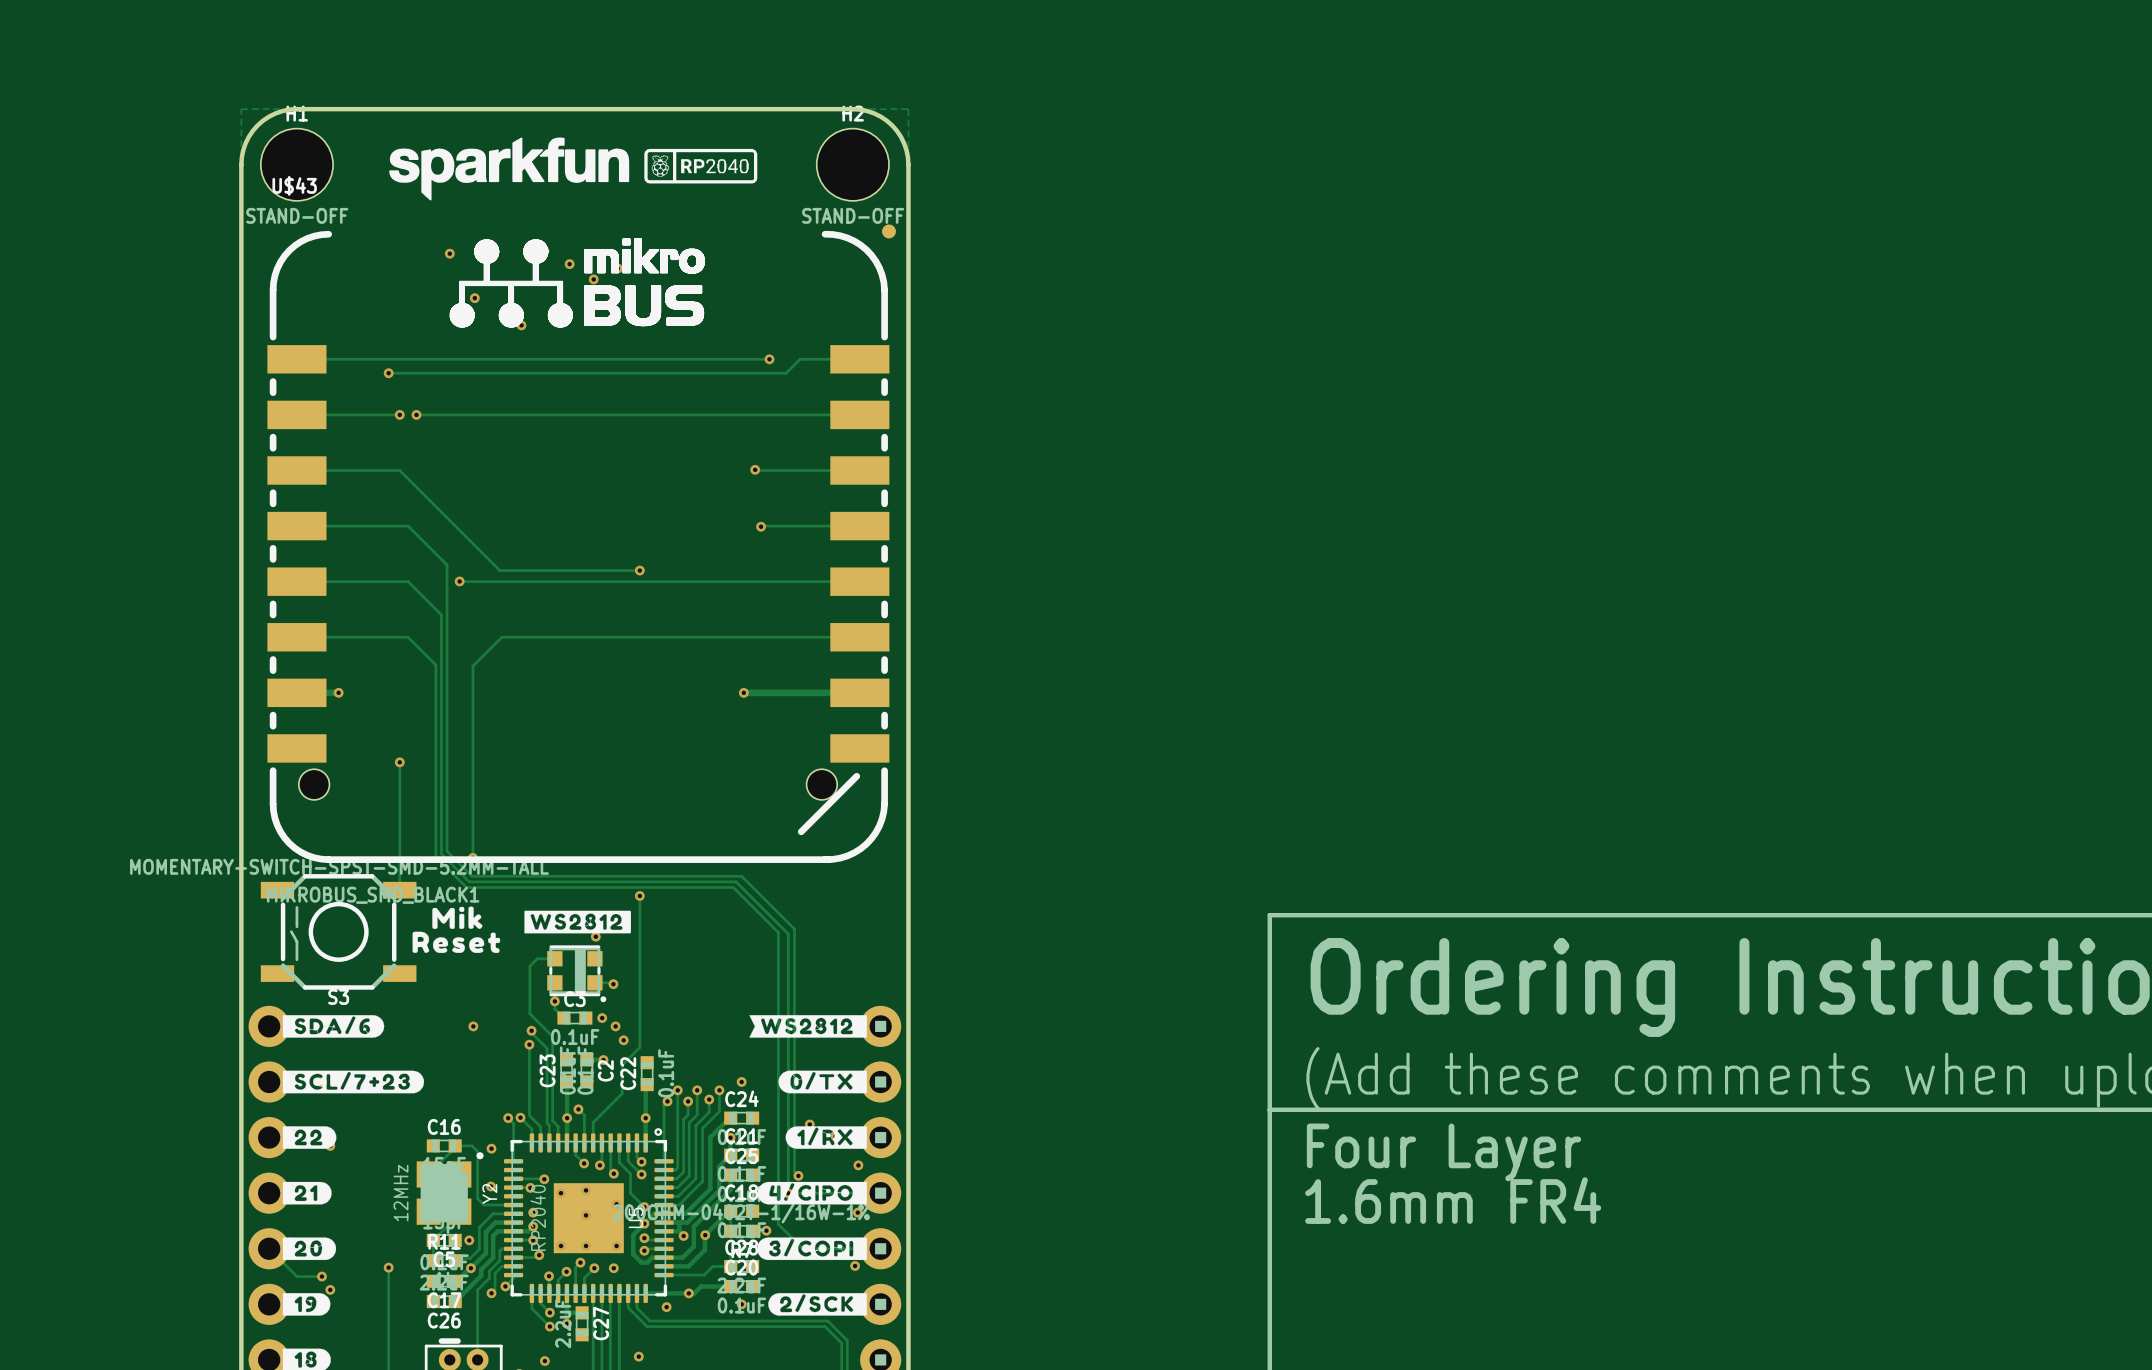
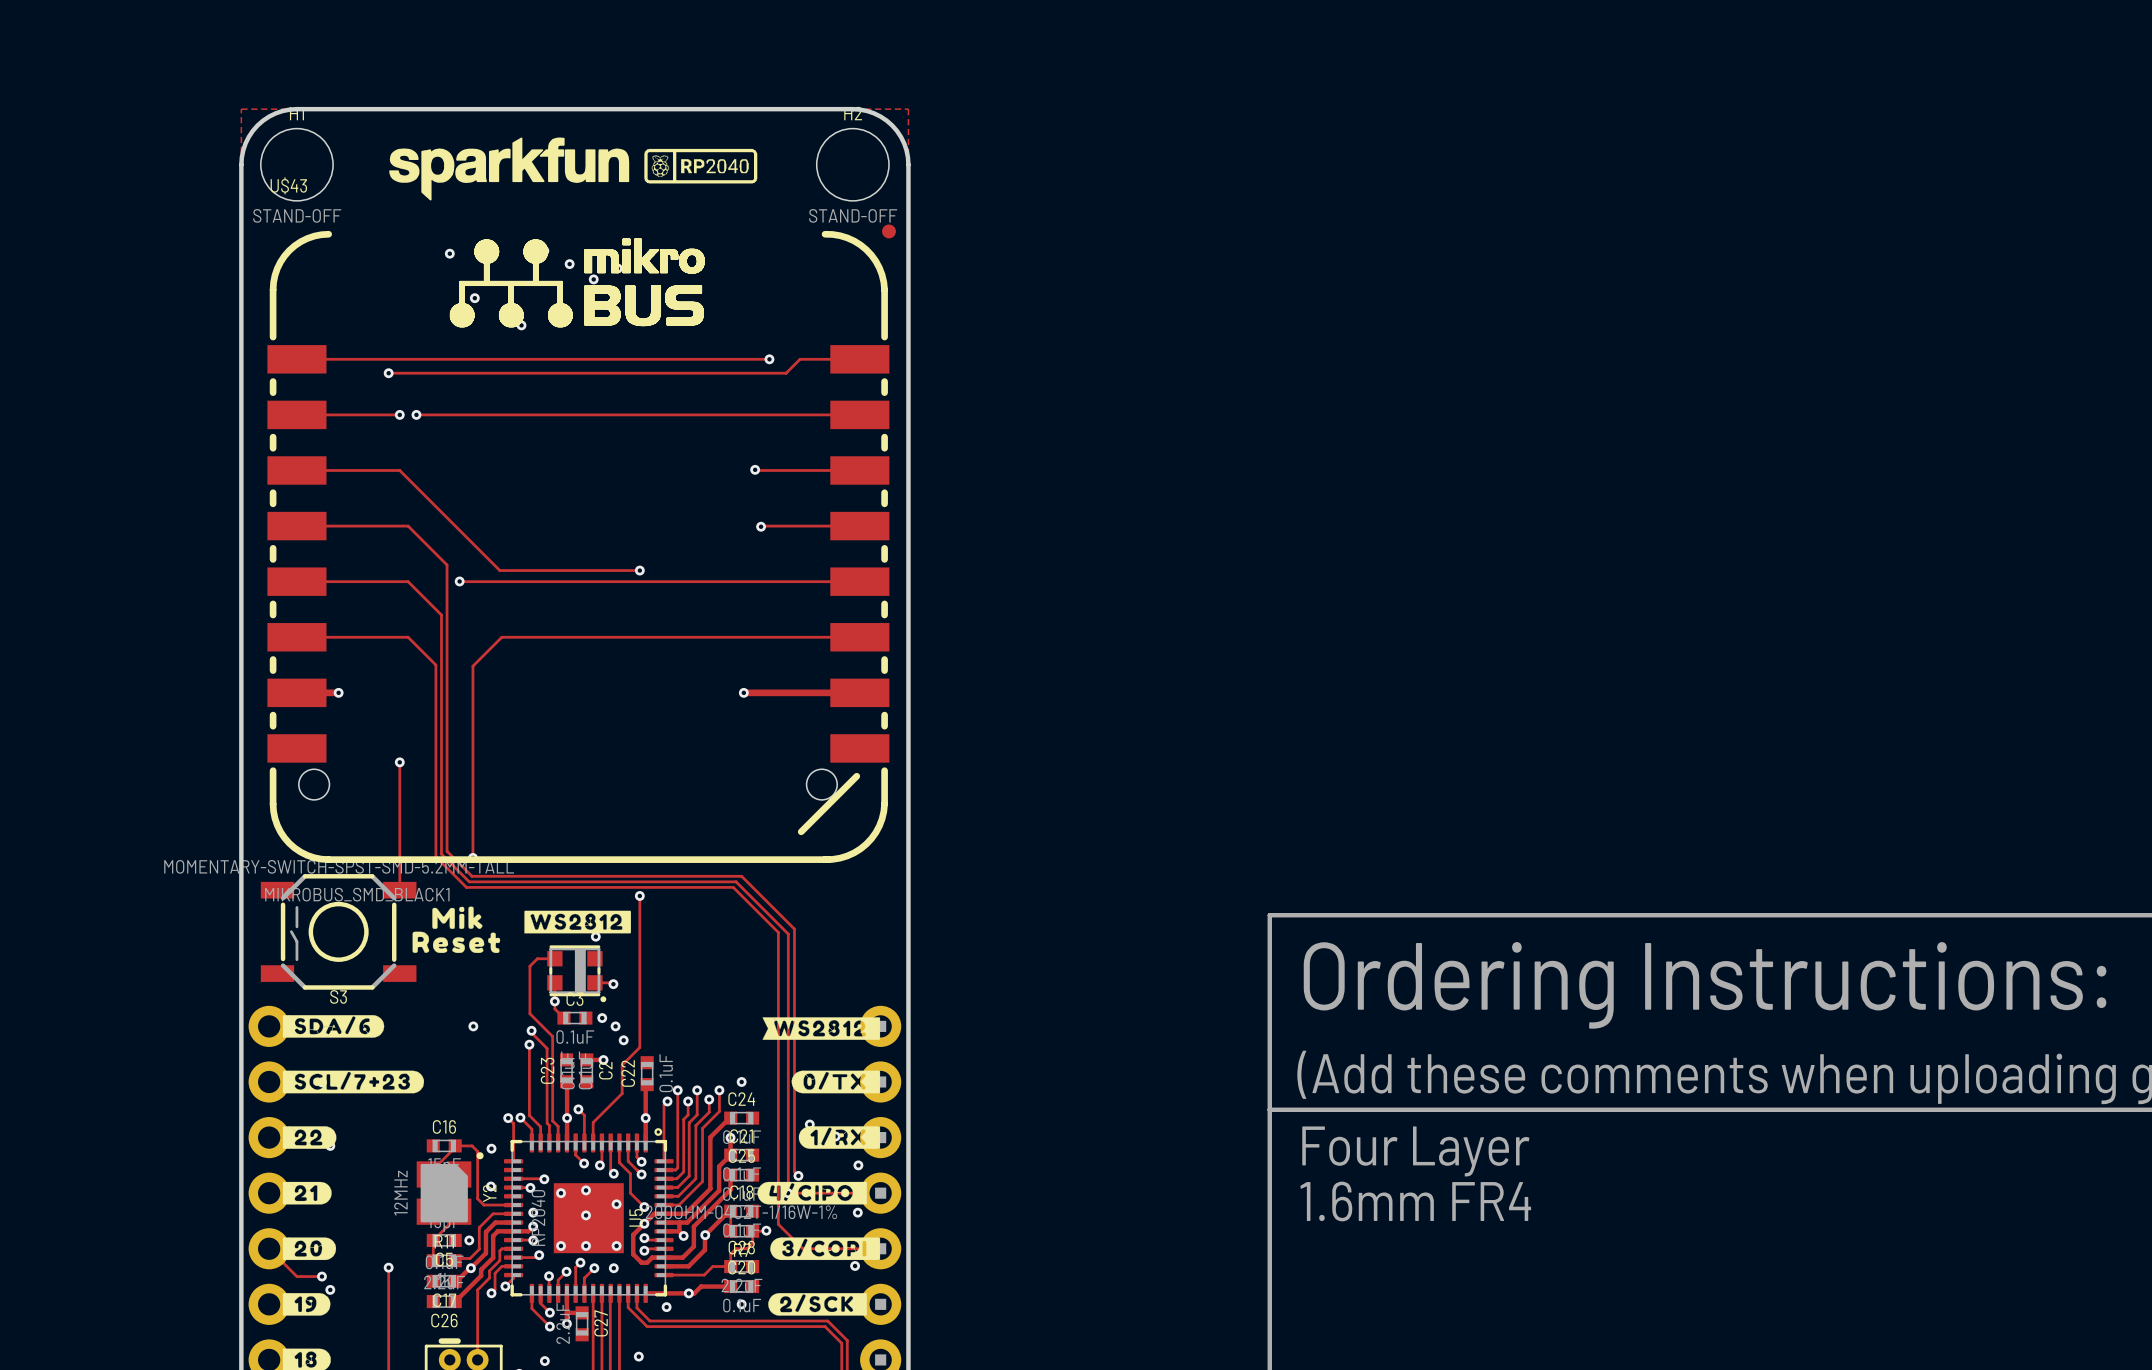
drawing position: (808, 1026) -> (821, 1028)
drawing position: (822, 1081) -> (835, 1081)
drawing position: (826, 1137) -> (839, 1137)
drawing position: (812, 1248) -> (825, 1248)

